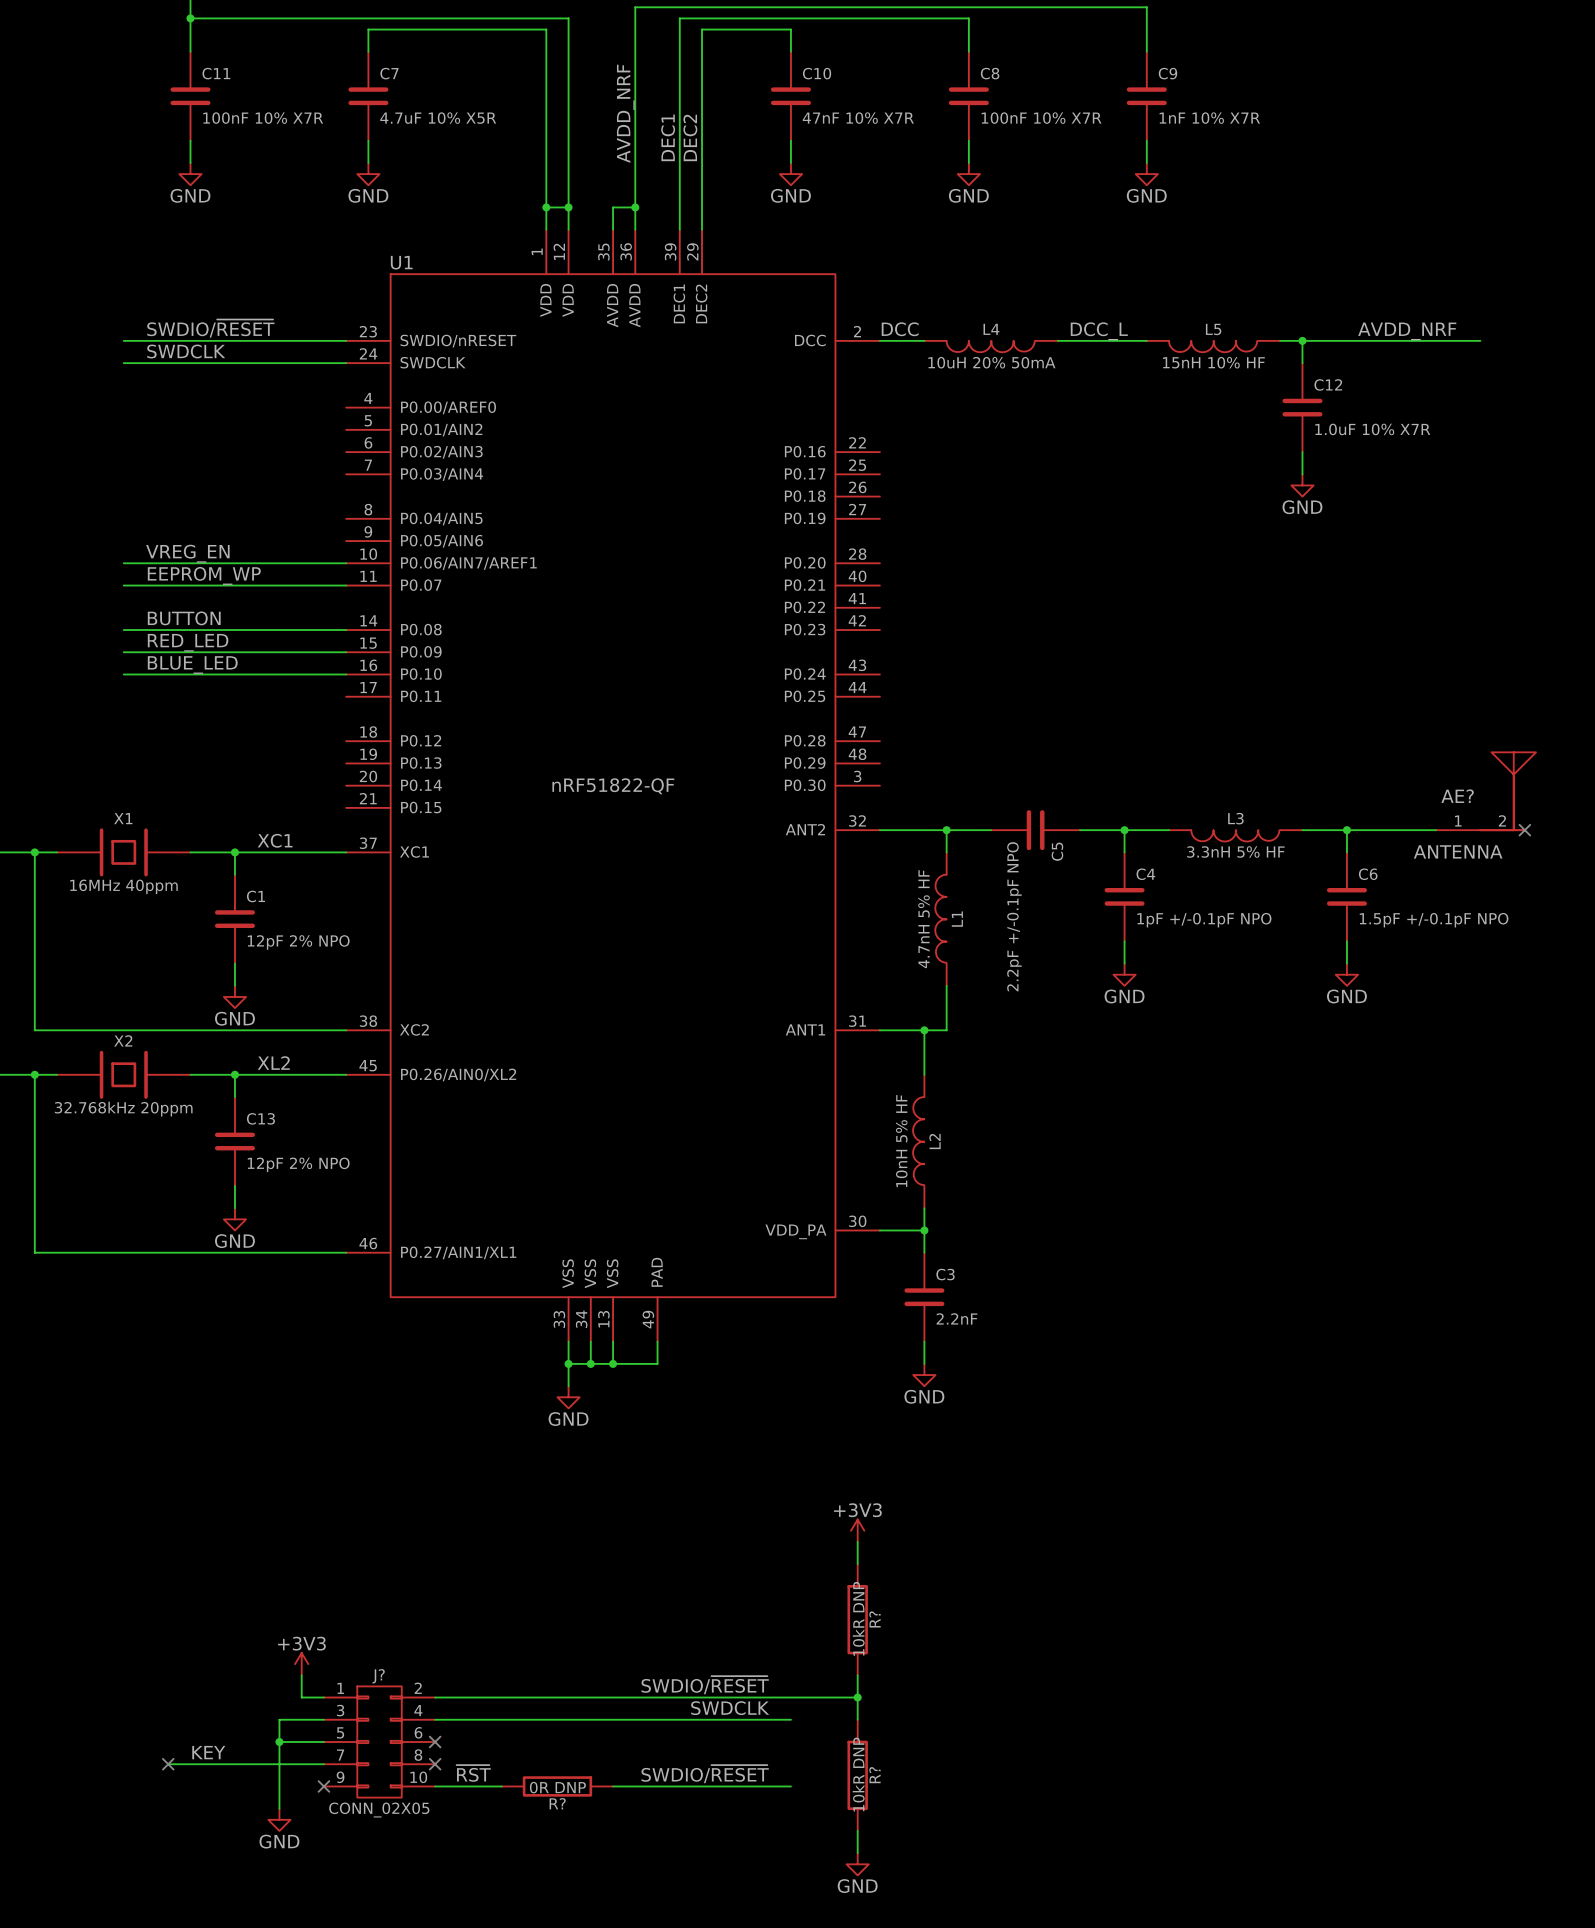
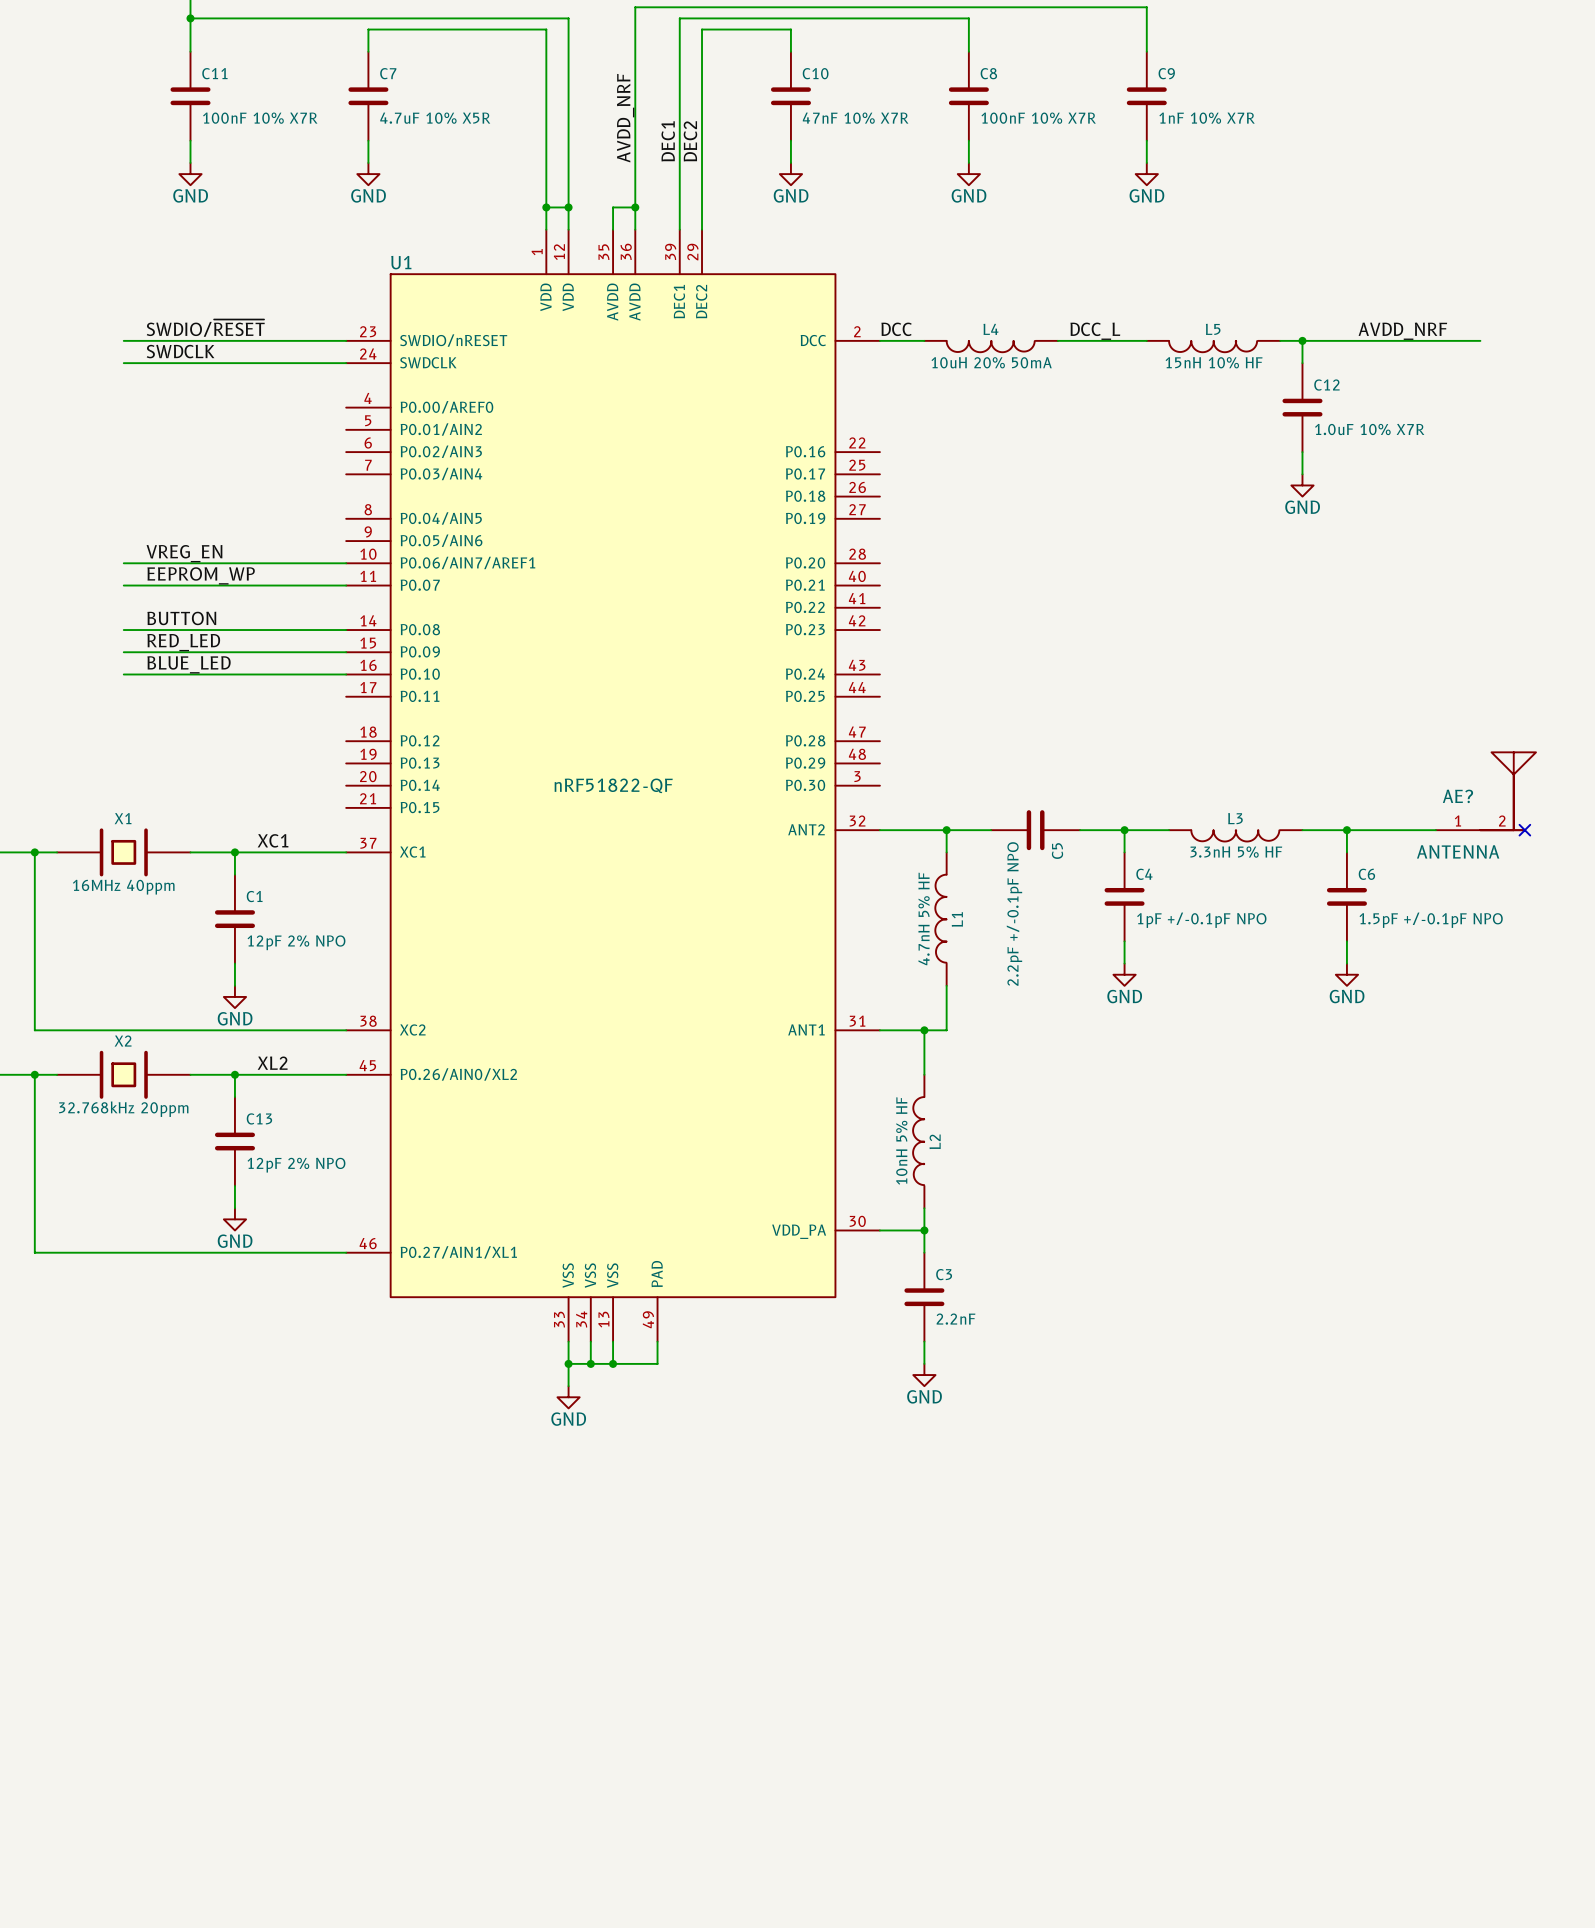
power symbol: +3V3 (857, 1530) -> none
wire: (857, 1541) (857, 1564) -> none
R?: 10kR DNP (857, 1619) -> none
power symbol: +3V3 (301, 1664) -> none
wire: (301, 1675) (301, 1697) (323, 1697) -> none
wire: (857, 1675) (857, 1719) -> none
label: SWDIO/~{RESET} (705, 1685) -> none
wire: (435, 1697) (857, 1697) -> none
junction: (857, 1697) -> none
label: SWDCLK (730, 1708) -> none
wire: (323, 1719) (279, 1719) (279, 1808) -> none
wire: (435, 1719) (790, 1719) -> none
wire: (279, 1741) (323, 1741) -> none
junction: (279, 1741) -> none
J?: CONN_02X05 (379, 1741) -> none
no-connect mark: (435, 1741) -> none
label: KEY (208, 1752) -> none
wire: (168, 1764) (323, 1764) -> none
no-connect mark: (168, 1764) -> none
no-connect mark: (435, 1764) -> none
label: ~{RST} (473, 1773) -> none
label: SWDIO/~{RESET} (705, 1774) -> none
R?: 10kR DNP (857, 1775) -> none
no-connect mark: (323, 1786) -> none
wire: (435, 1786) (501, 1786) -> none
R?: 0R DNP (557, 1786) -> none
wire: (613, 1786) (790, 1786) -> none
power symbol: GND (279, 1819) -> none
wire: (857, 1830) (857, 1853) -> none
power symbol: GND (857, 1864) -> none

